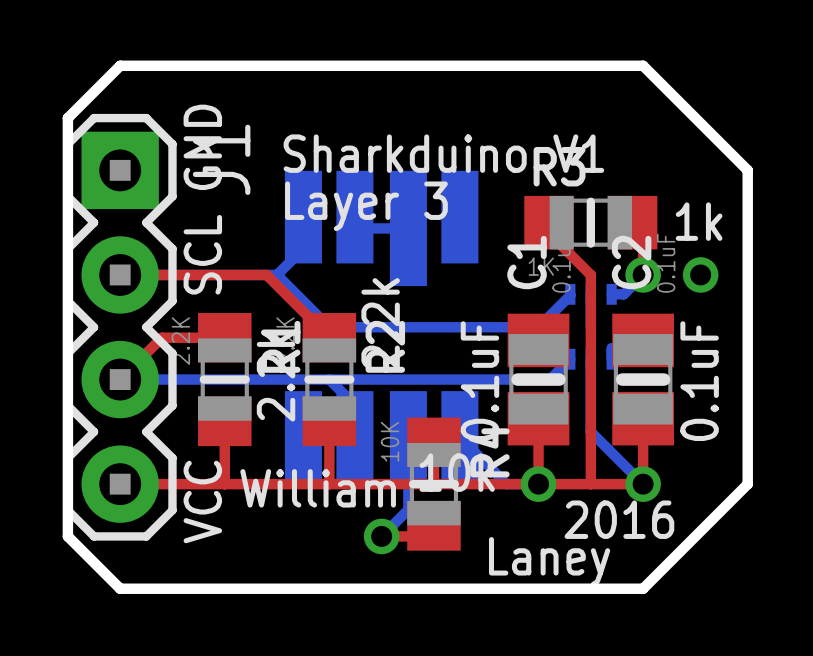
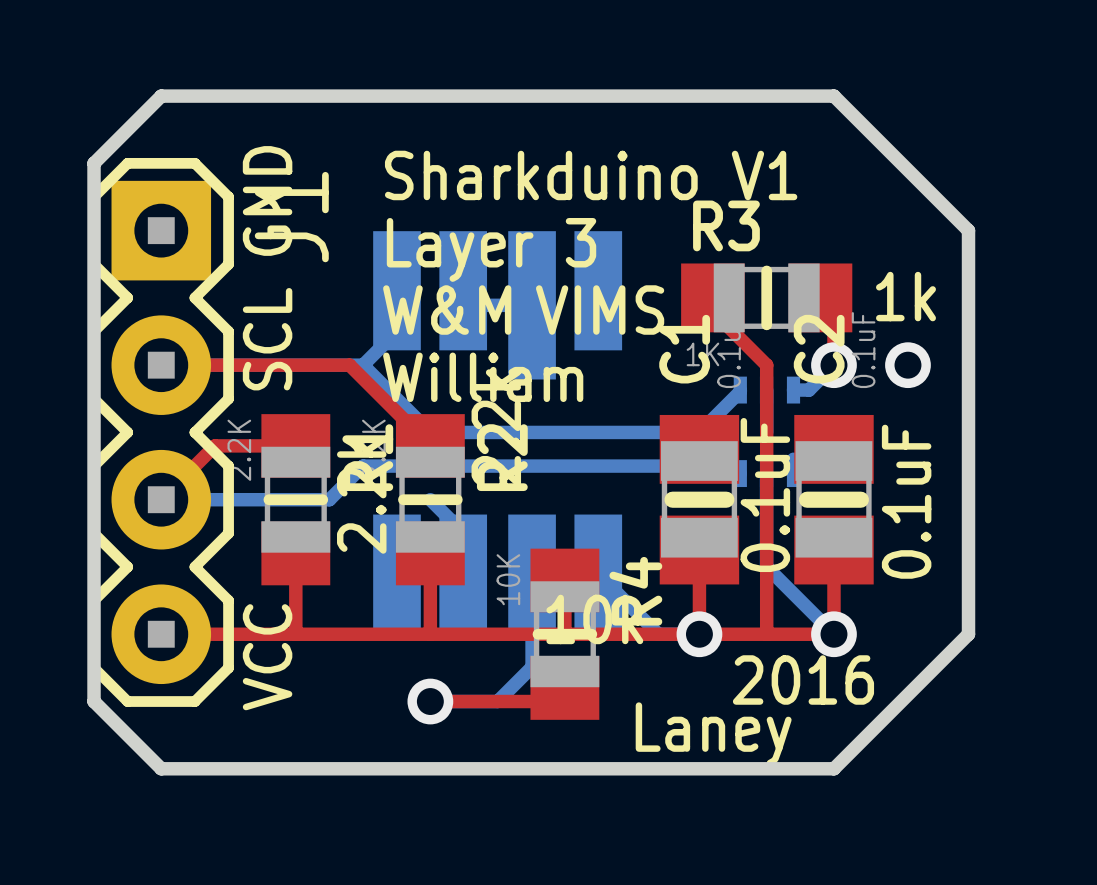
text position: Sharkduino V1 (443, 153) -> Sharkduino V1 (591, 175)
text position: Layer 3 (366, 206) -> Layer 3 (491, 249)
text: none -> W&M (447, 310)
text: none -> VIMS (600, 310)
bottom track: (570, 359) (550, 379) (250, 379) -> (740, 473) (732, 466) (363, 466) (329, 499)
text position: 0.1uF (479, 381) -> 0.1uF (765, 495)
text position: William (318, 488) -> William (483, 377)
top track: none -> (430, 701) (497, 701)
via position: (381, 536) -> (430, 701)

